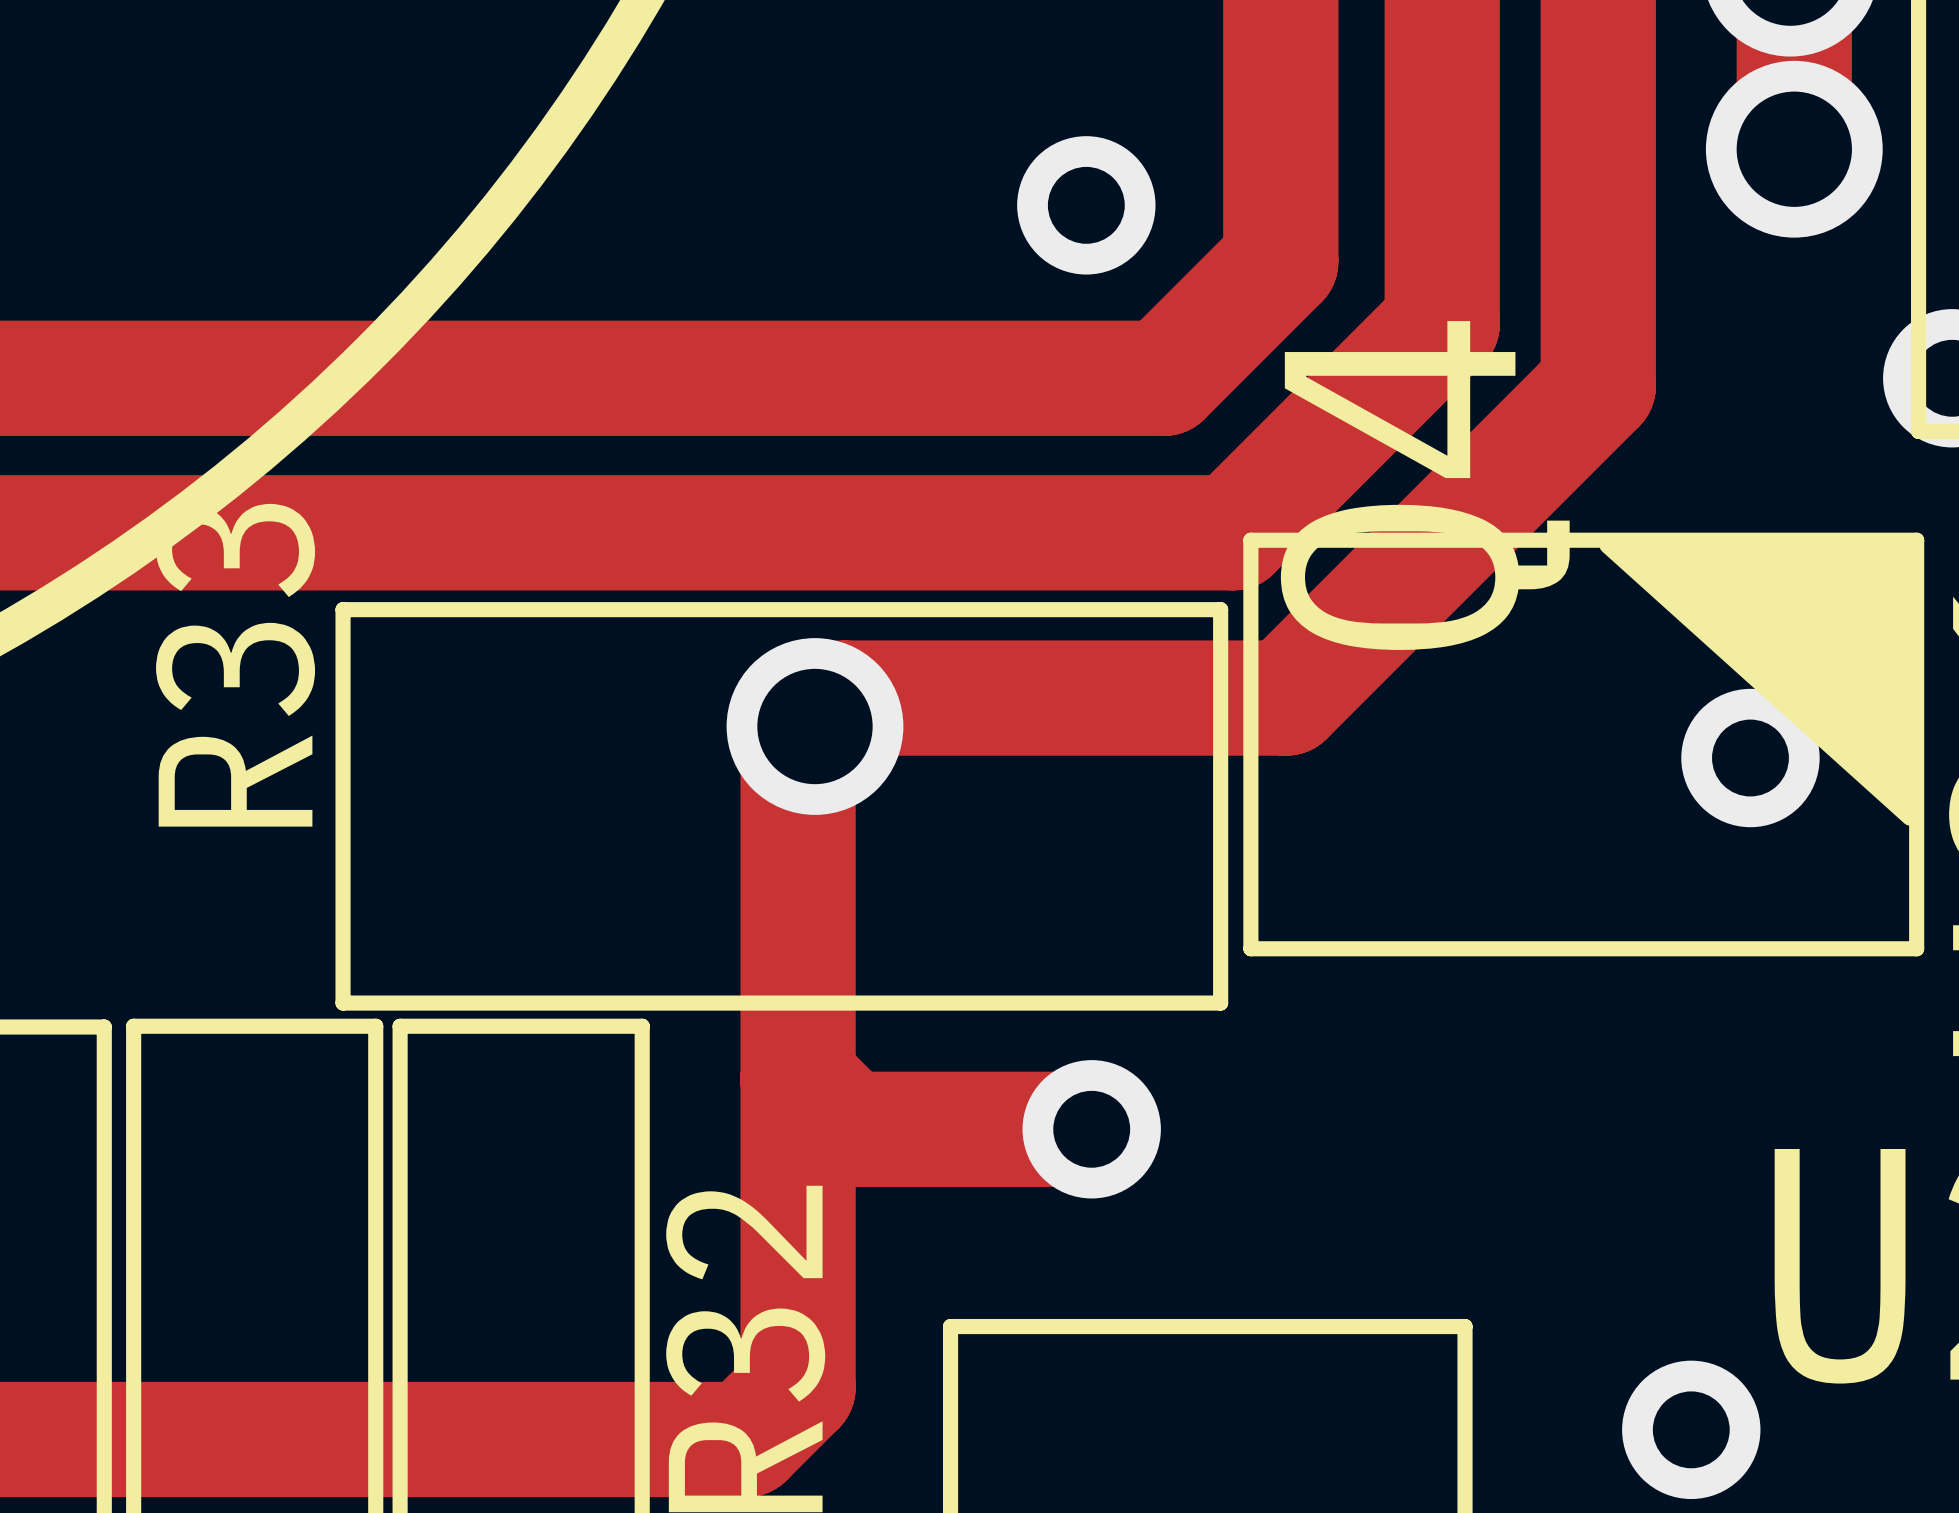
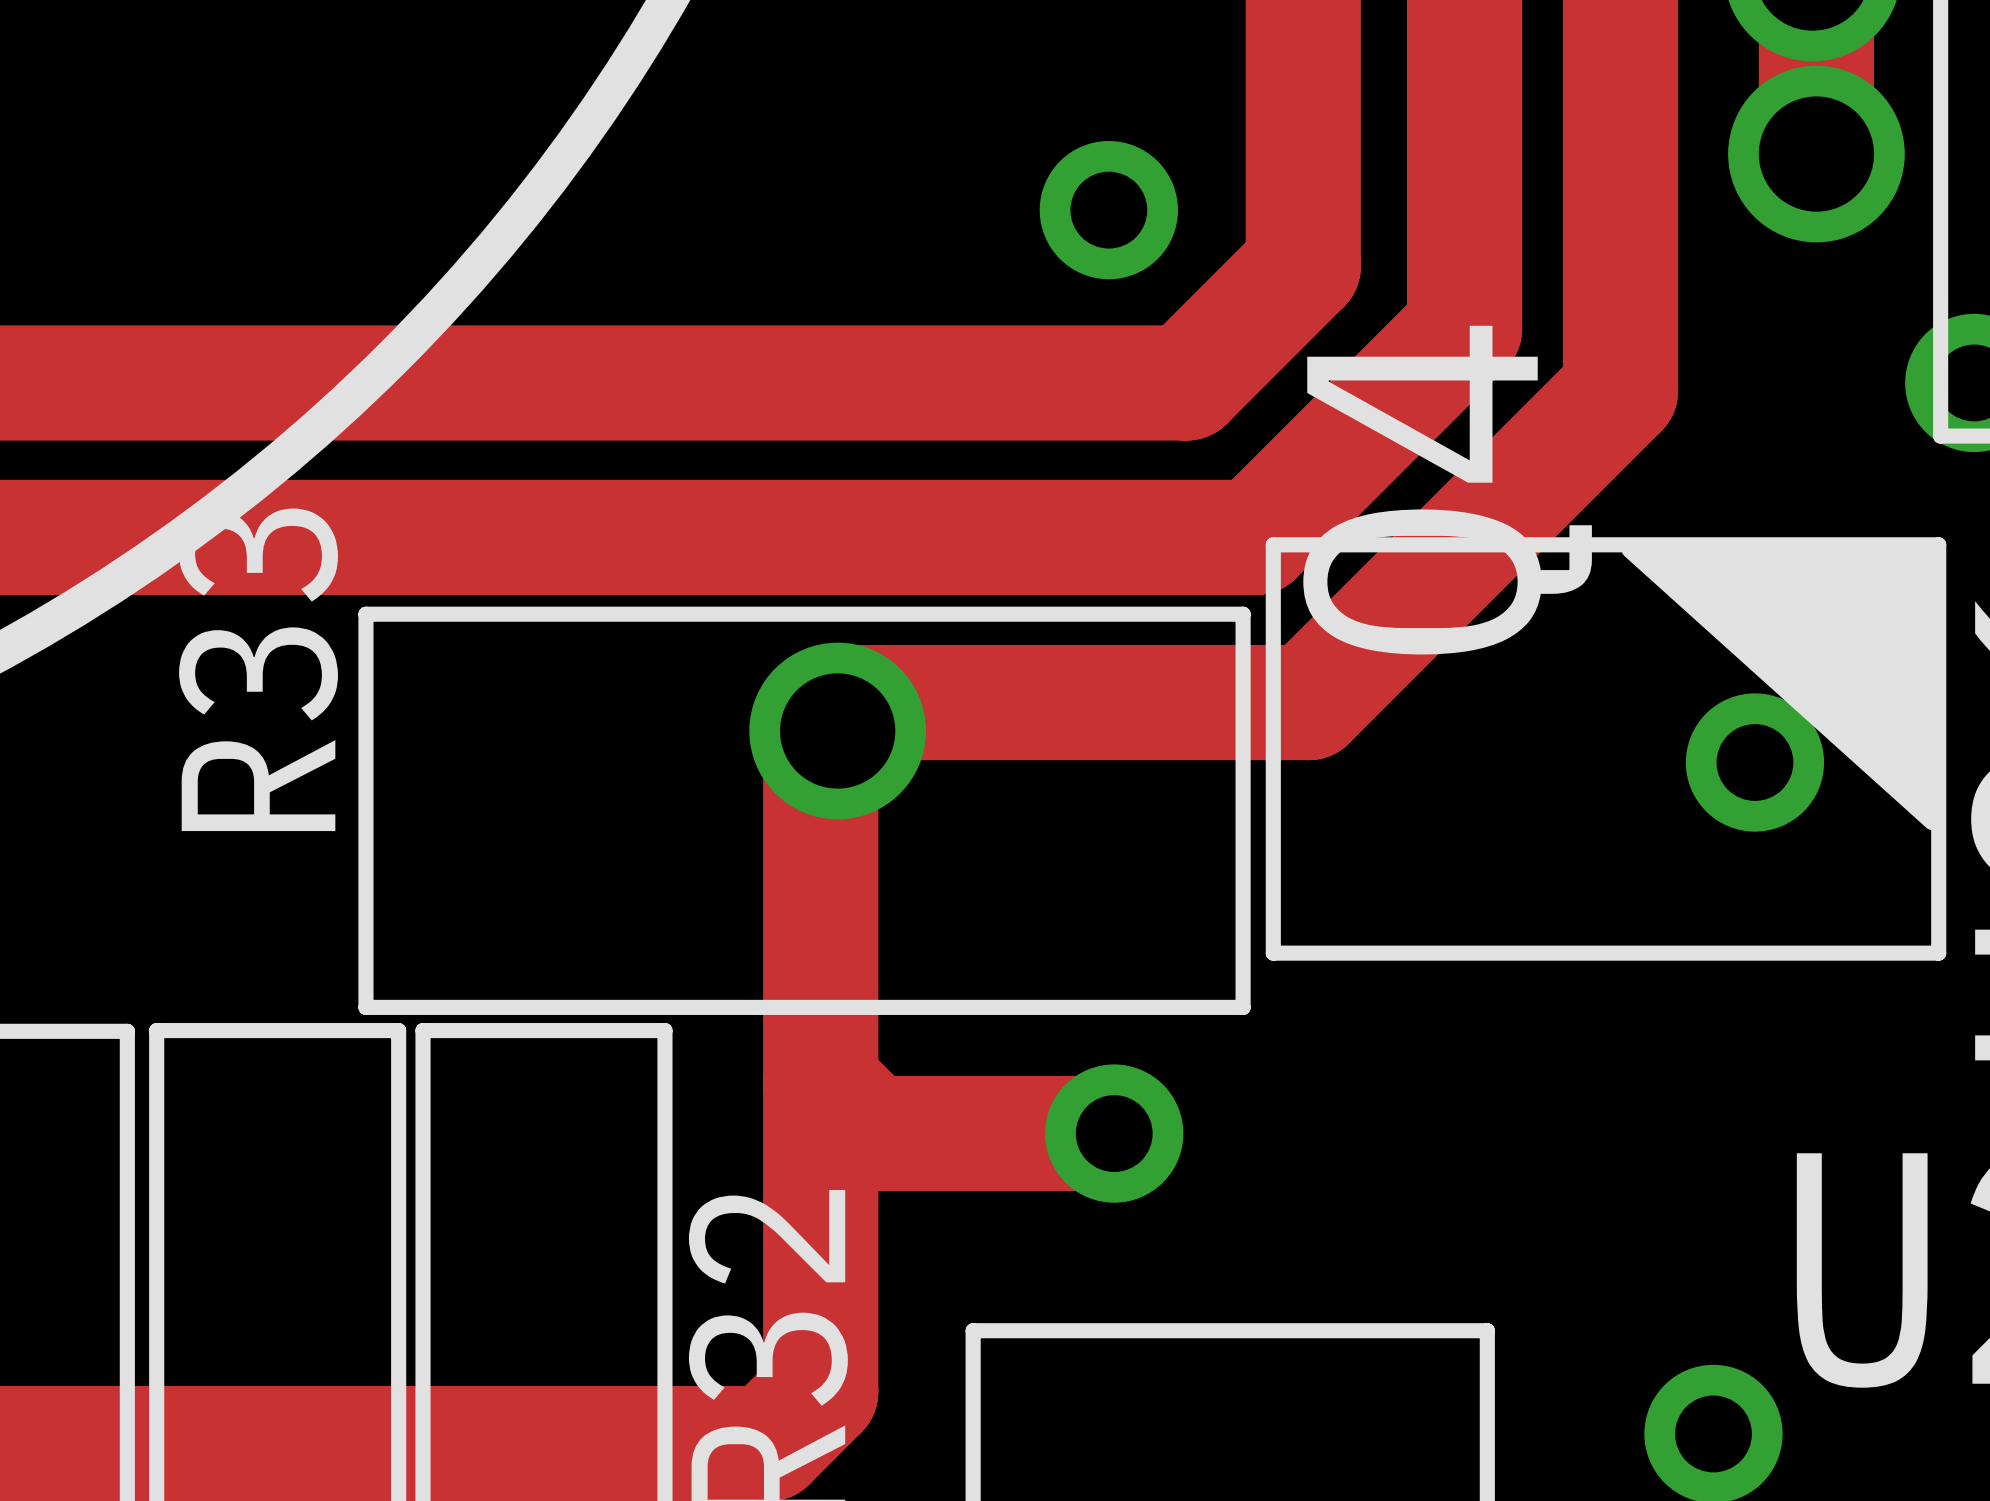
via position: (1750, 758) -> (1754, 762)

